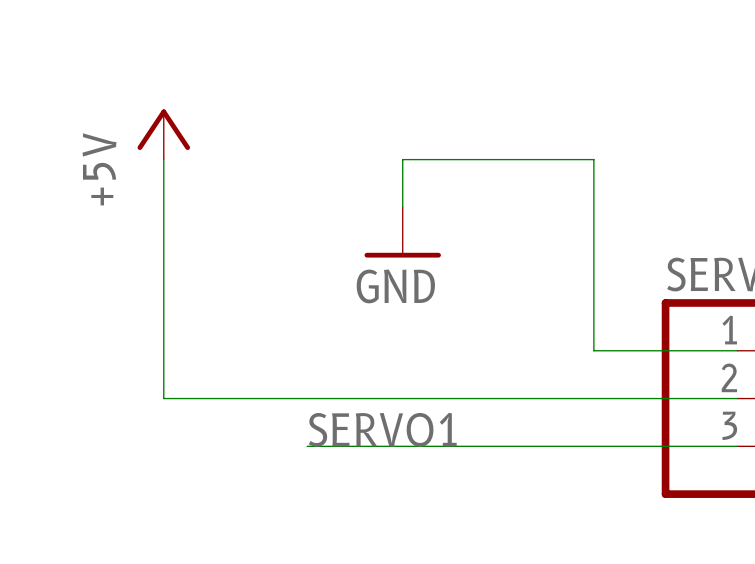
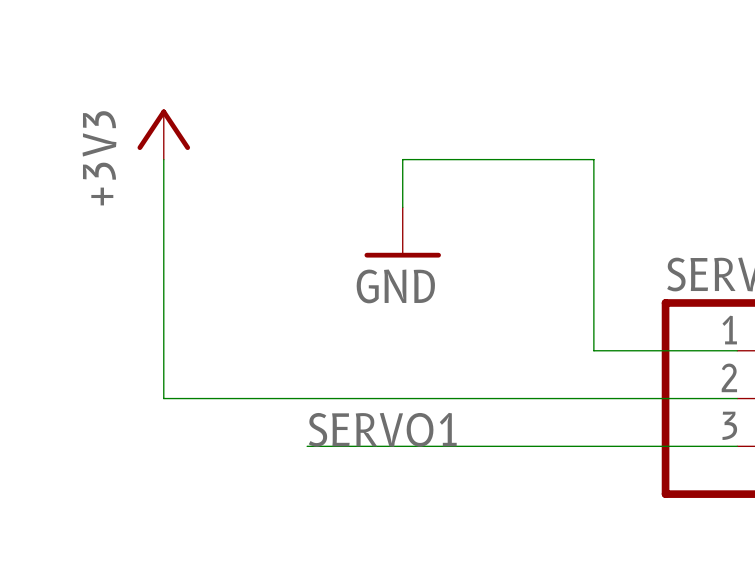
power symbol: +5V (163, 134) -> +3V3 (163, 134)

